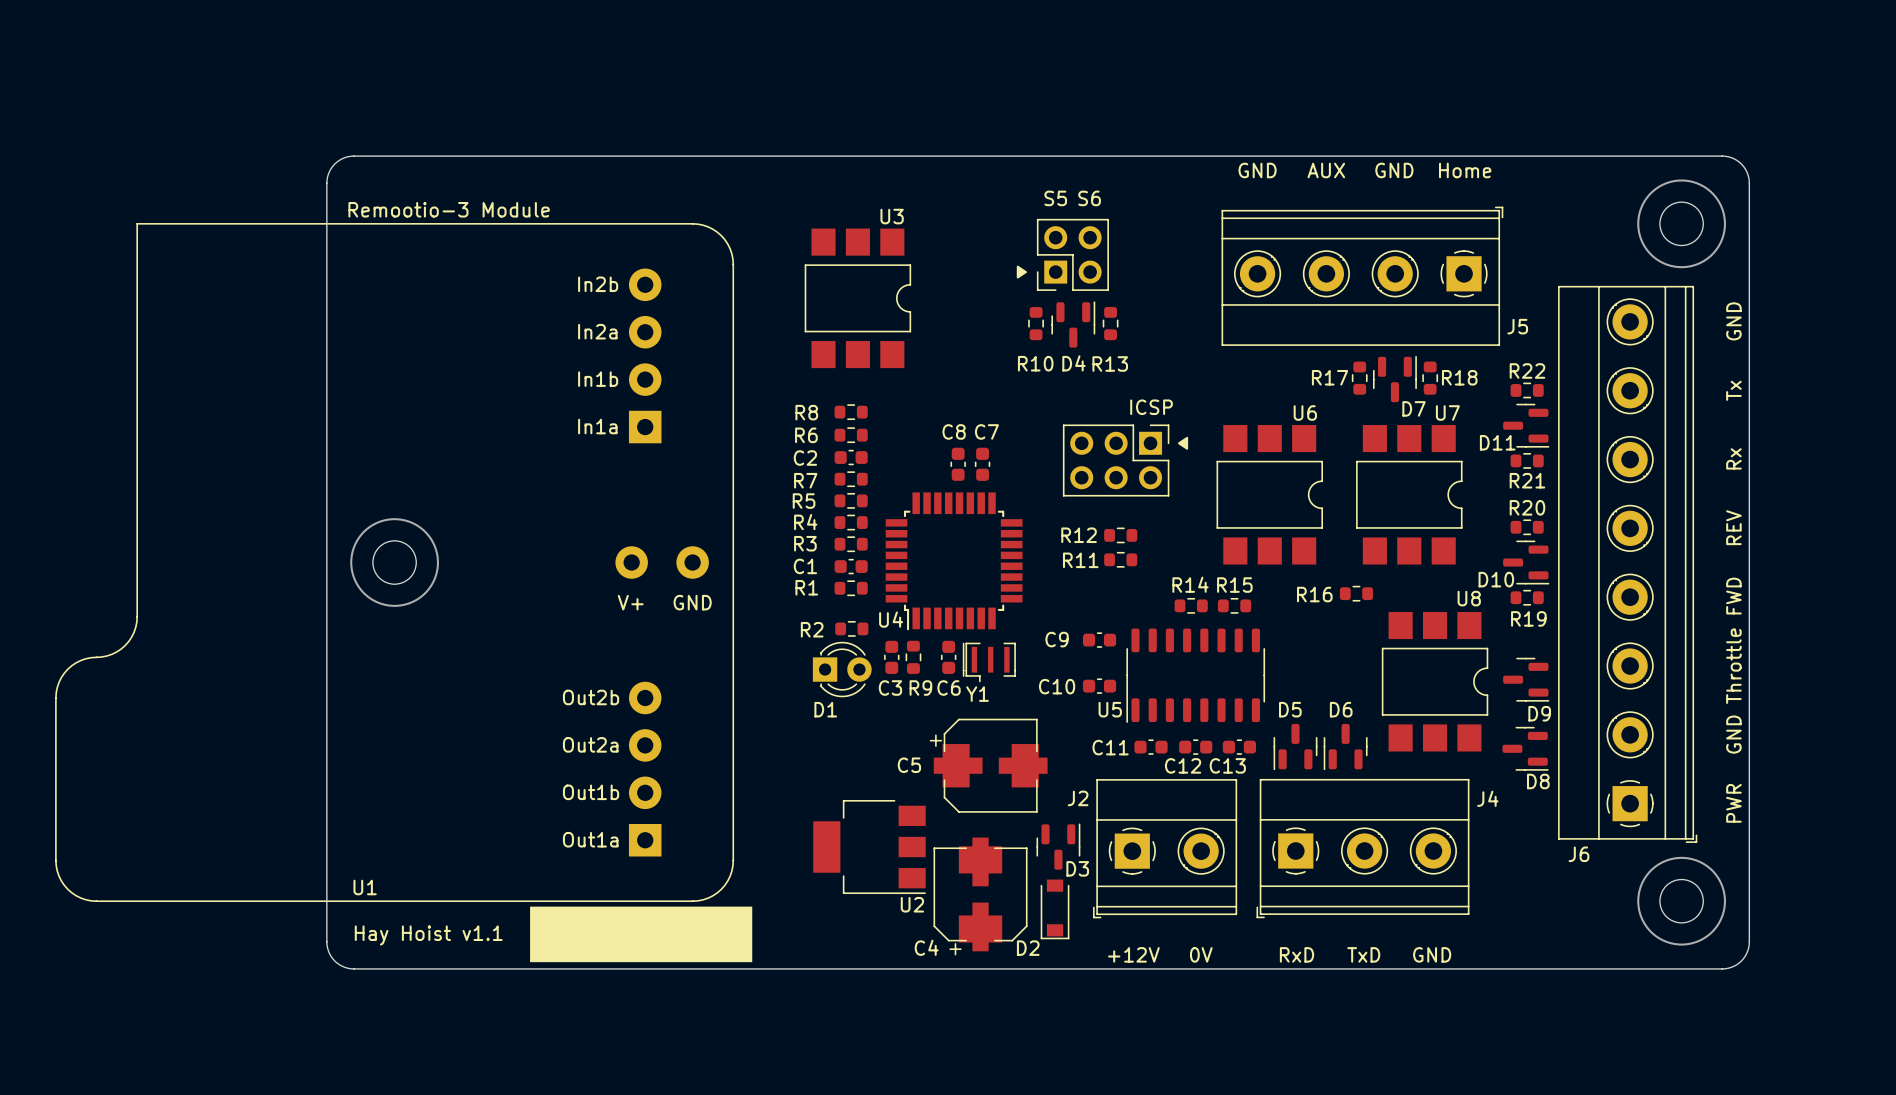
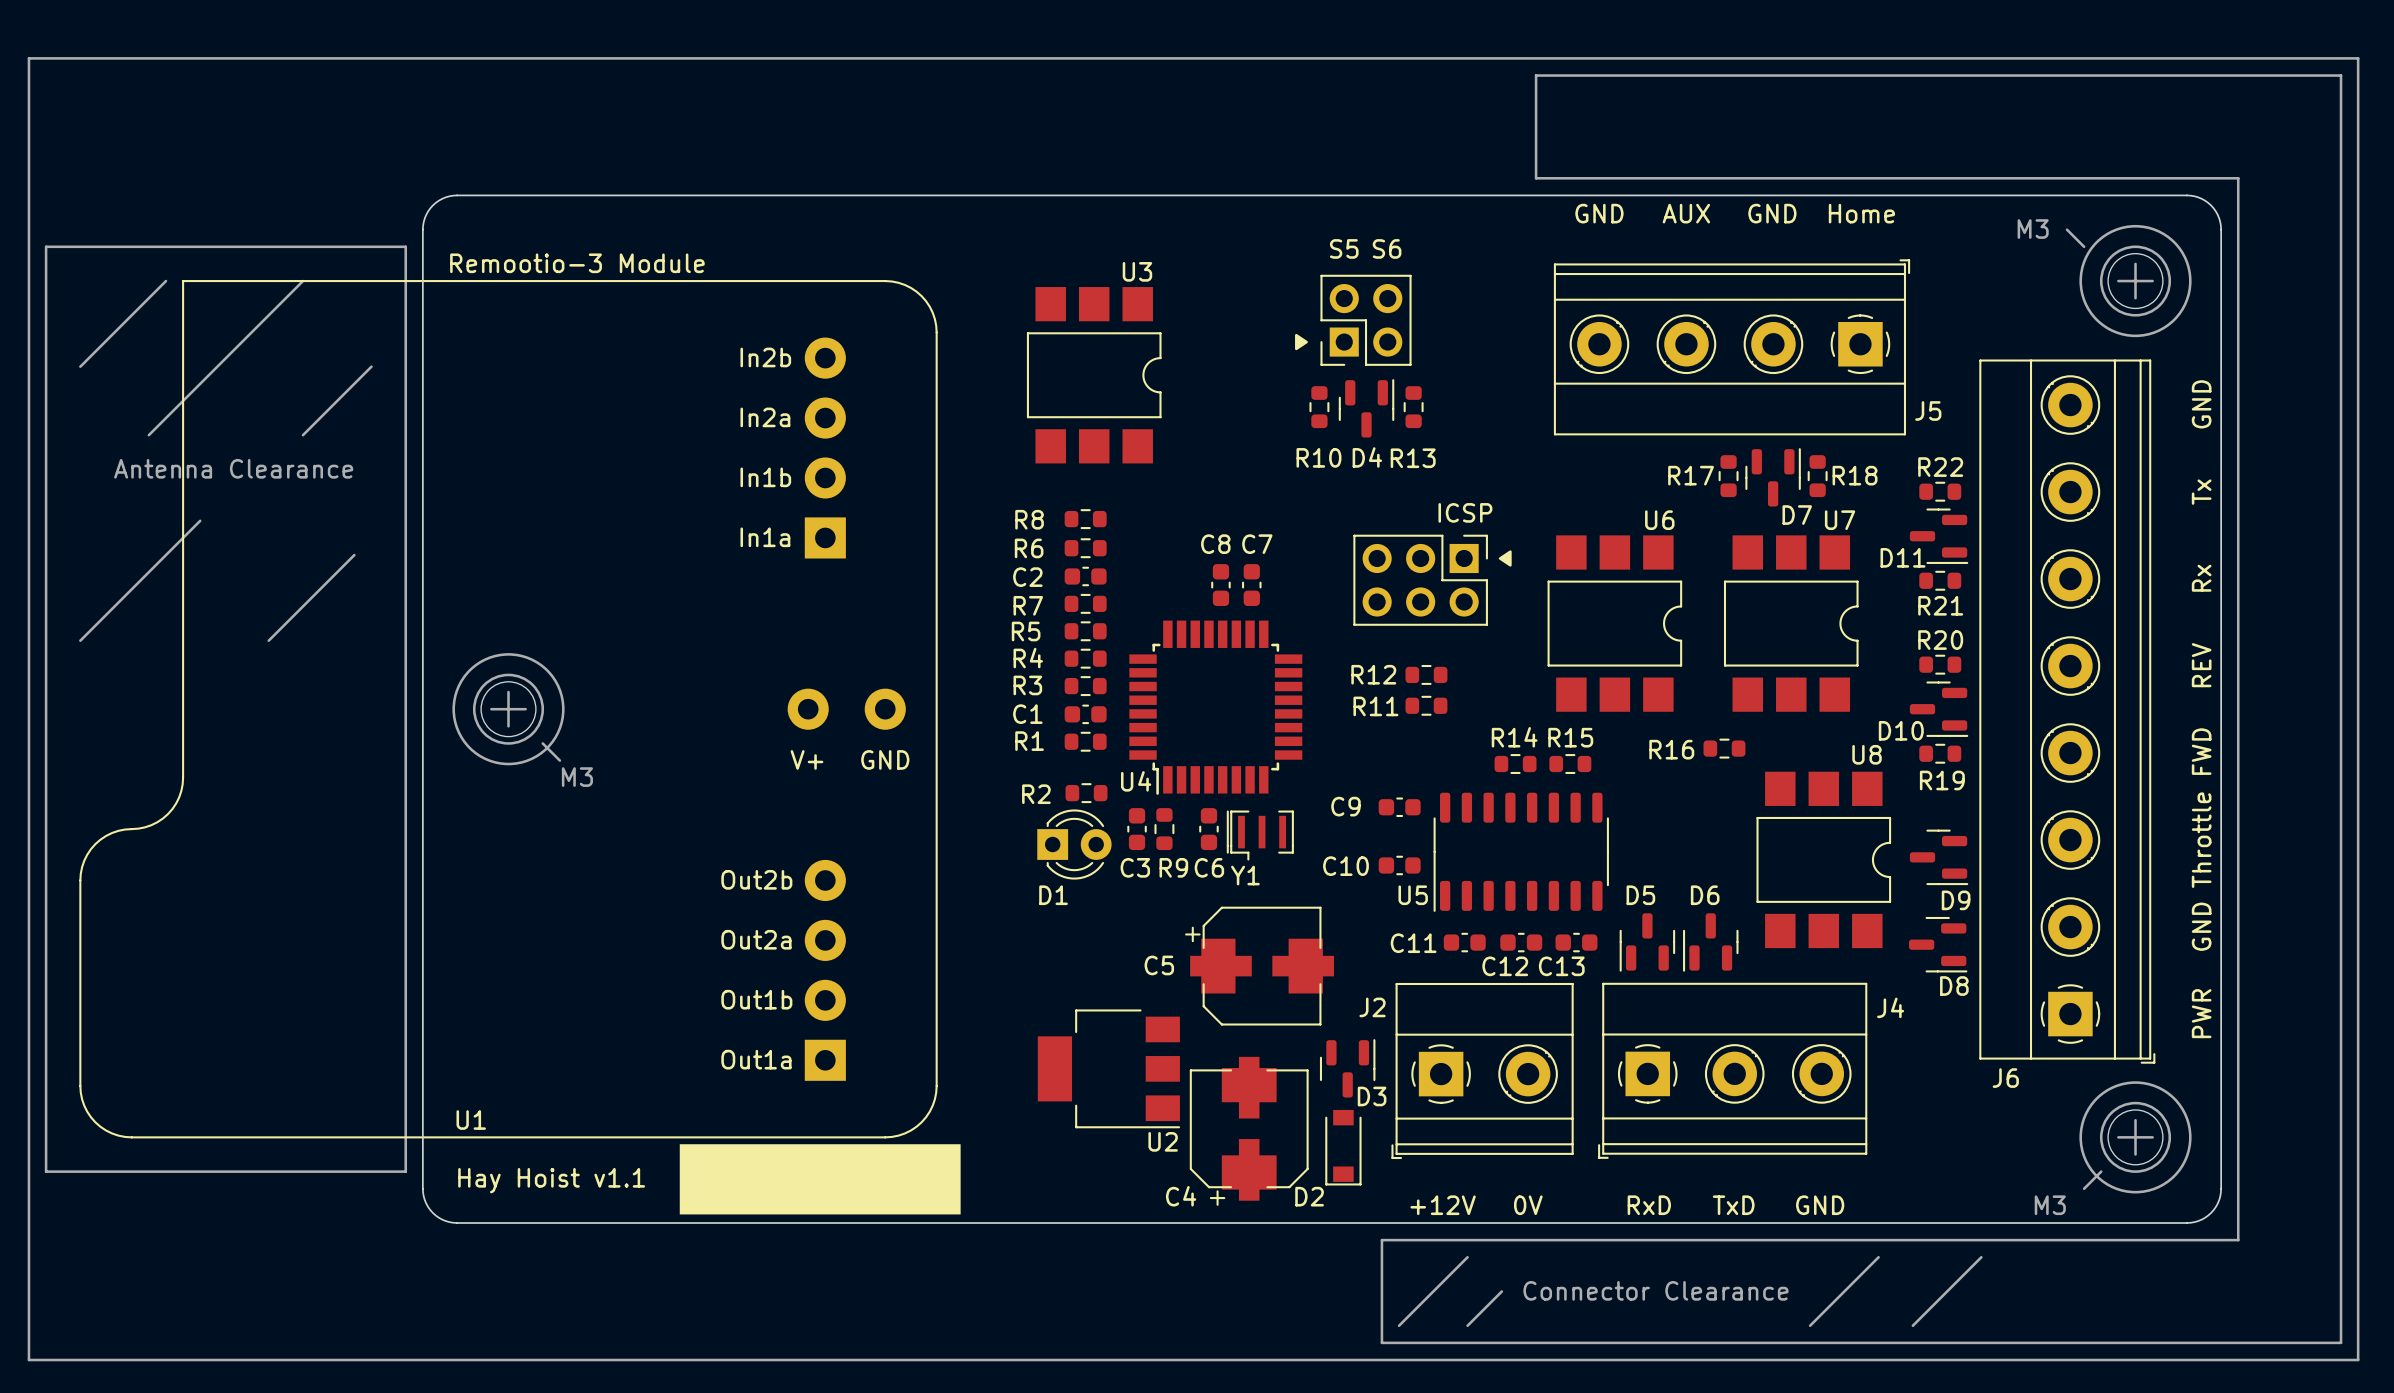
line: none -> (28, 58) (2358, 58) (2358, 1360) (28, 1360) (28, 58)
line: none -> (1536, 75) (1536, 178) (2238, 178) (2238, 1240) (1381, 1240) (1381, 1342) (2341, 1342) (2341, 75) (1536, 75)
text: none -> M3 (2033, 229)
line: none -> (2066, 229) (2084, 246)
drawing: none -> [2099, 245, 2172, 317]
line: none -> (46, 246) (405, 246) (405, 1171) (46, 1171) (46, 246)
line: none -> (2135, 263) (2135, 298)
line: none -> (165, 281) (80, 366)
line: none -> (302, 281) (148, 435)
line: none -> (2118, 281) (2152, 281)
line: none -> (371, 366) (302, 435)
text: none -> Antenna Clearance (233, 468)
line: none -> (200, 520) (80, 640)
line: none -> (354, 555) (268, 640)
drawing: none -> [472, 673, 545, 745]
line: none -> (508, 692) (508, 726)
line: none -> (491, 709) (525, 709)
line: none -> (542, 743) (559, 760)
text: none -> M3 (577, 777)
drawing: none -> [2099, 1101, 2172, 1173]
line: none -> (2135, 1120) (2135, 1154)
line: none -> (2118, 1137) (2152, 1137)
line: none -> (2101, 1171) (2084, 1188)
text: none -> M3 (2050, 1205)
line: none -> (1467, 1257) (1399, 1325)
line: none -> (1878, 1257) (1810, 1325)
line: none -> (1981, 1257) (1912, 1325)
text: none -> Connector Clearance (1655, 1290)
line: none -> (1501, 1291) (1467, 1325)

